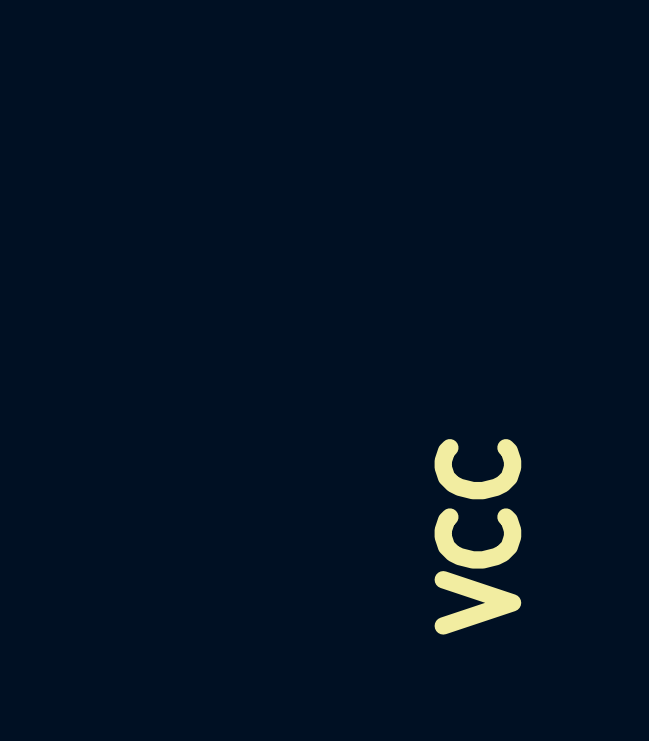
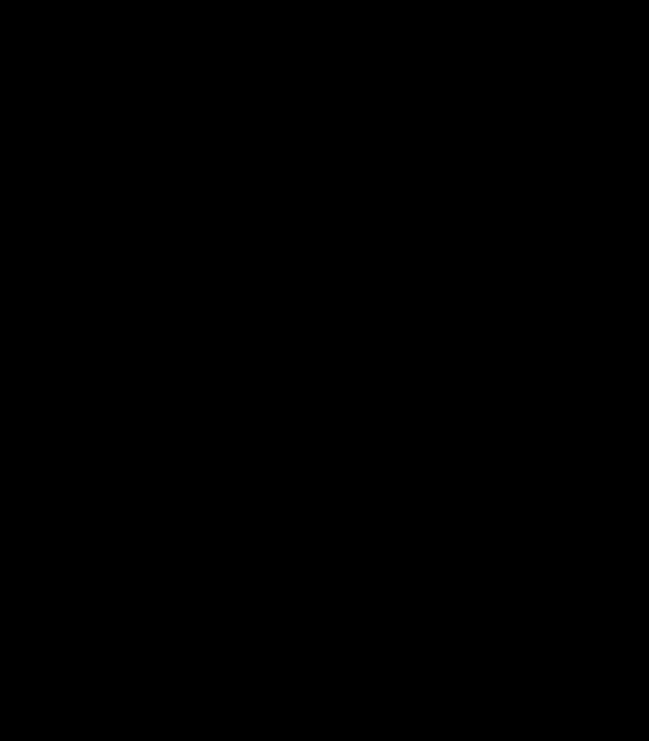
text: VCC (477, 536) -> none

